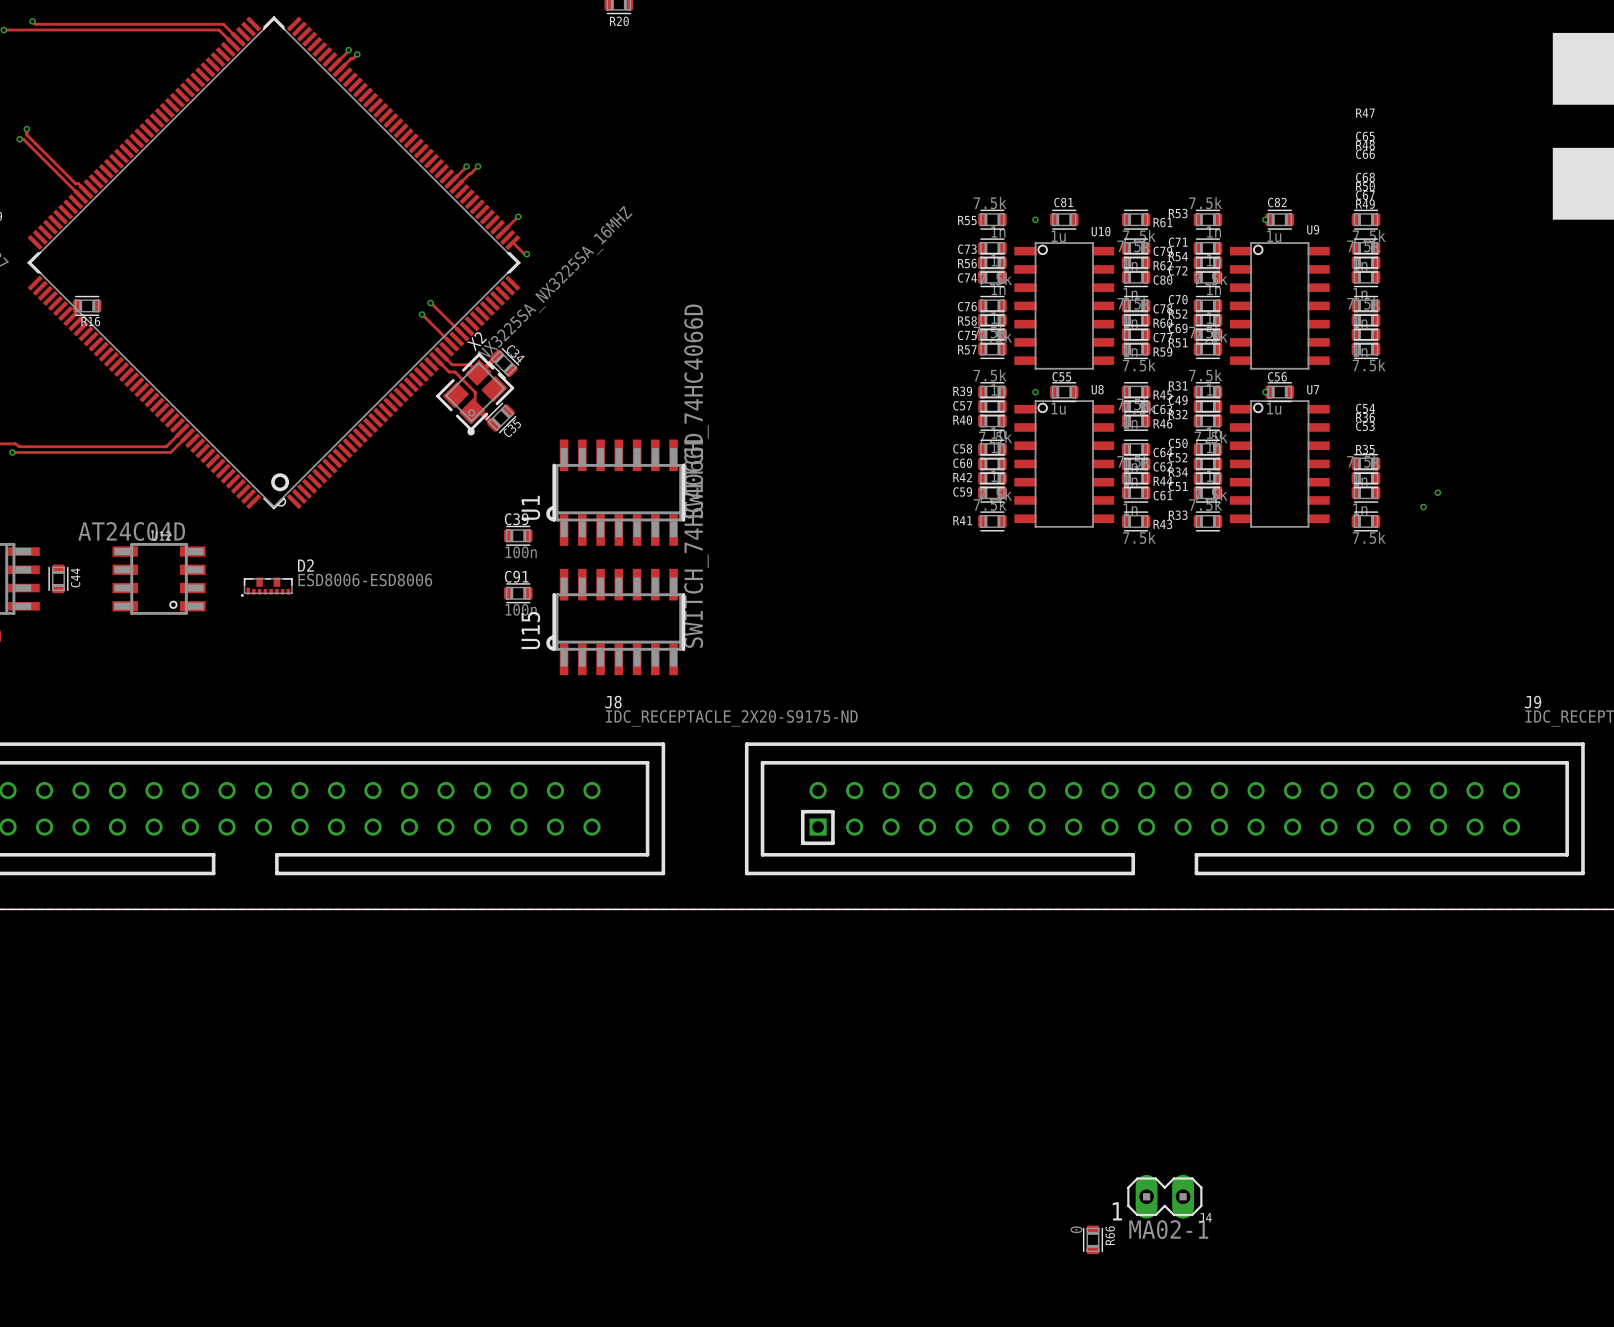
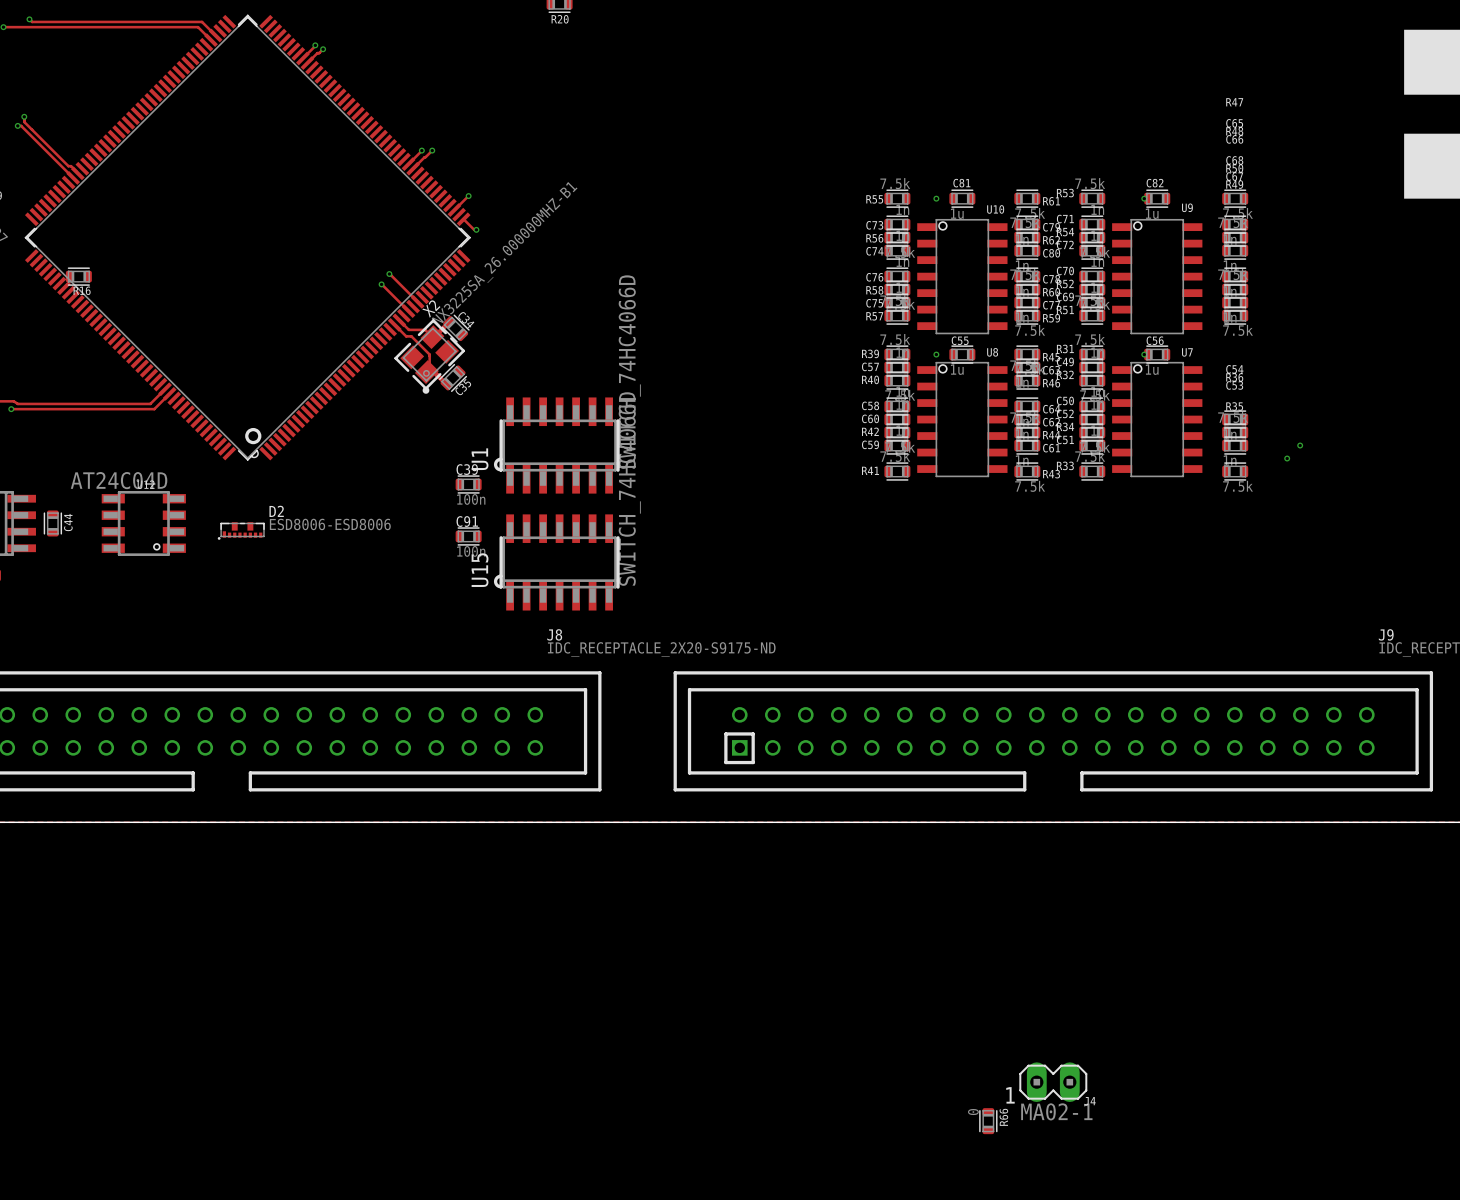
X2 value: NX3225SA_NX3225SA_16MHZ (555, 283) -> NX3225SA_26.000000MHZ-B1 (504, 254)

